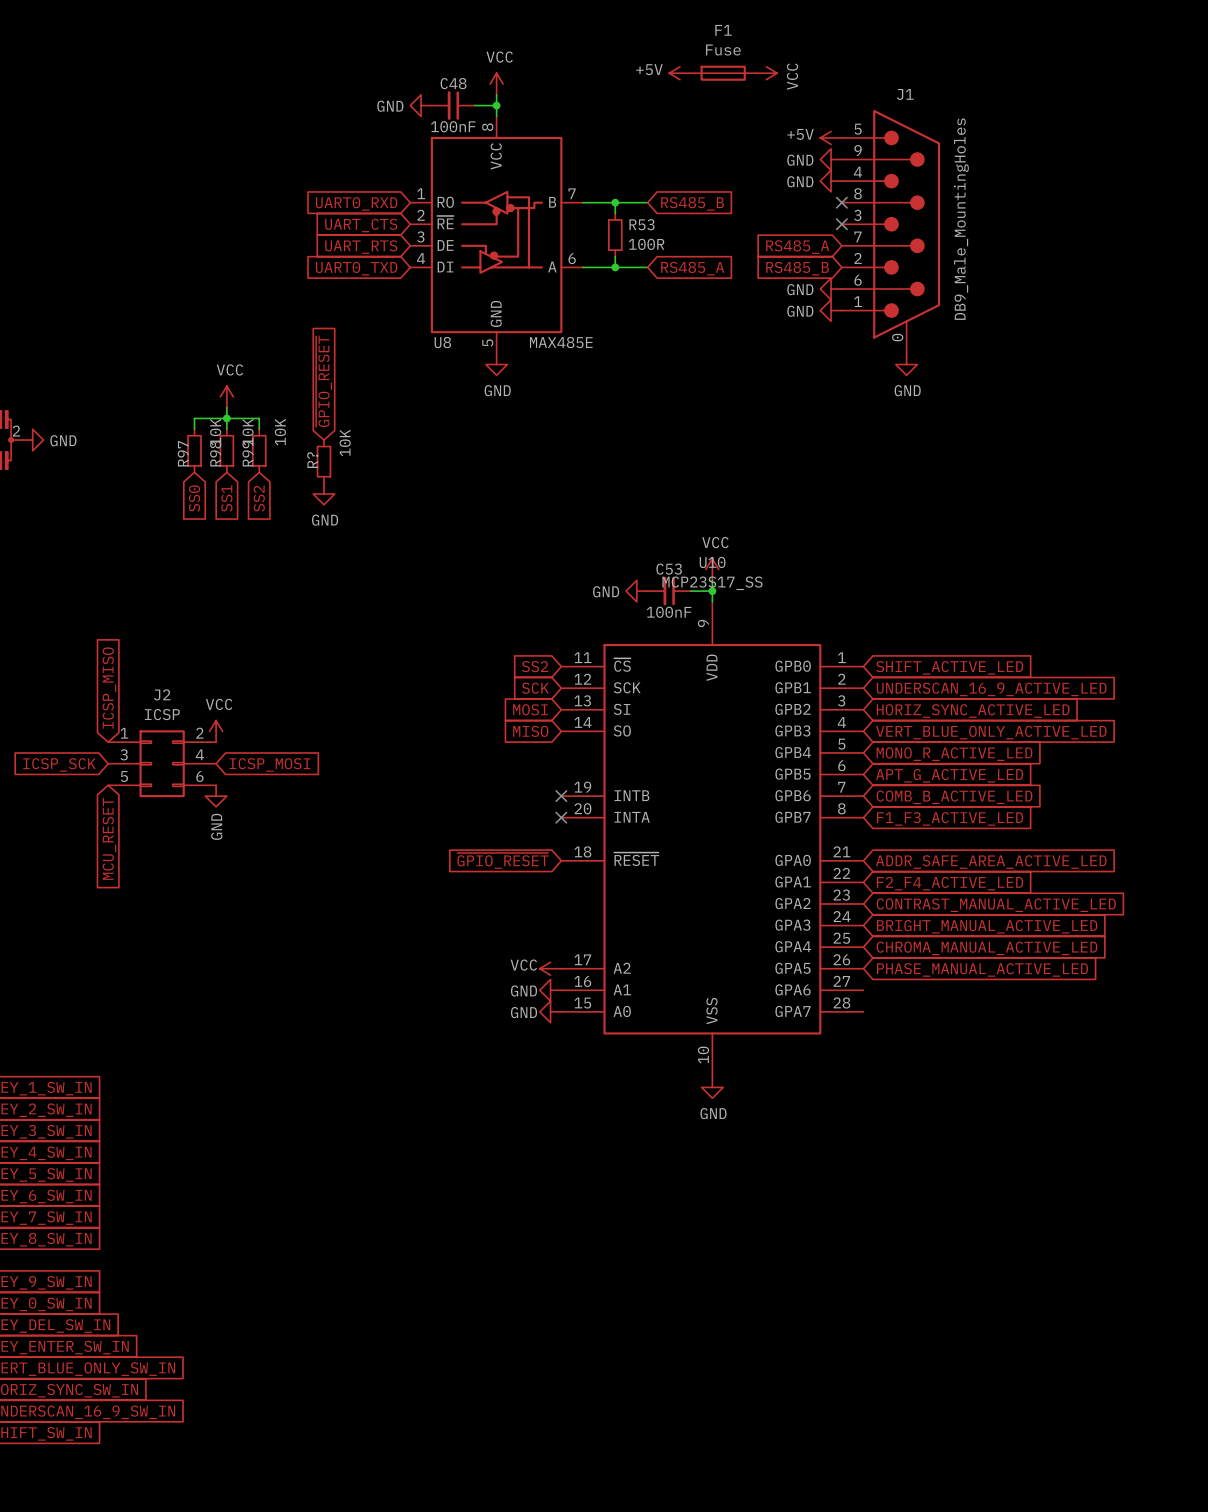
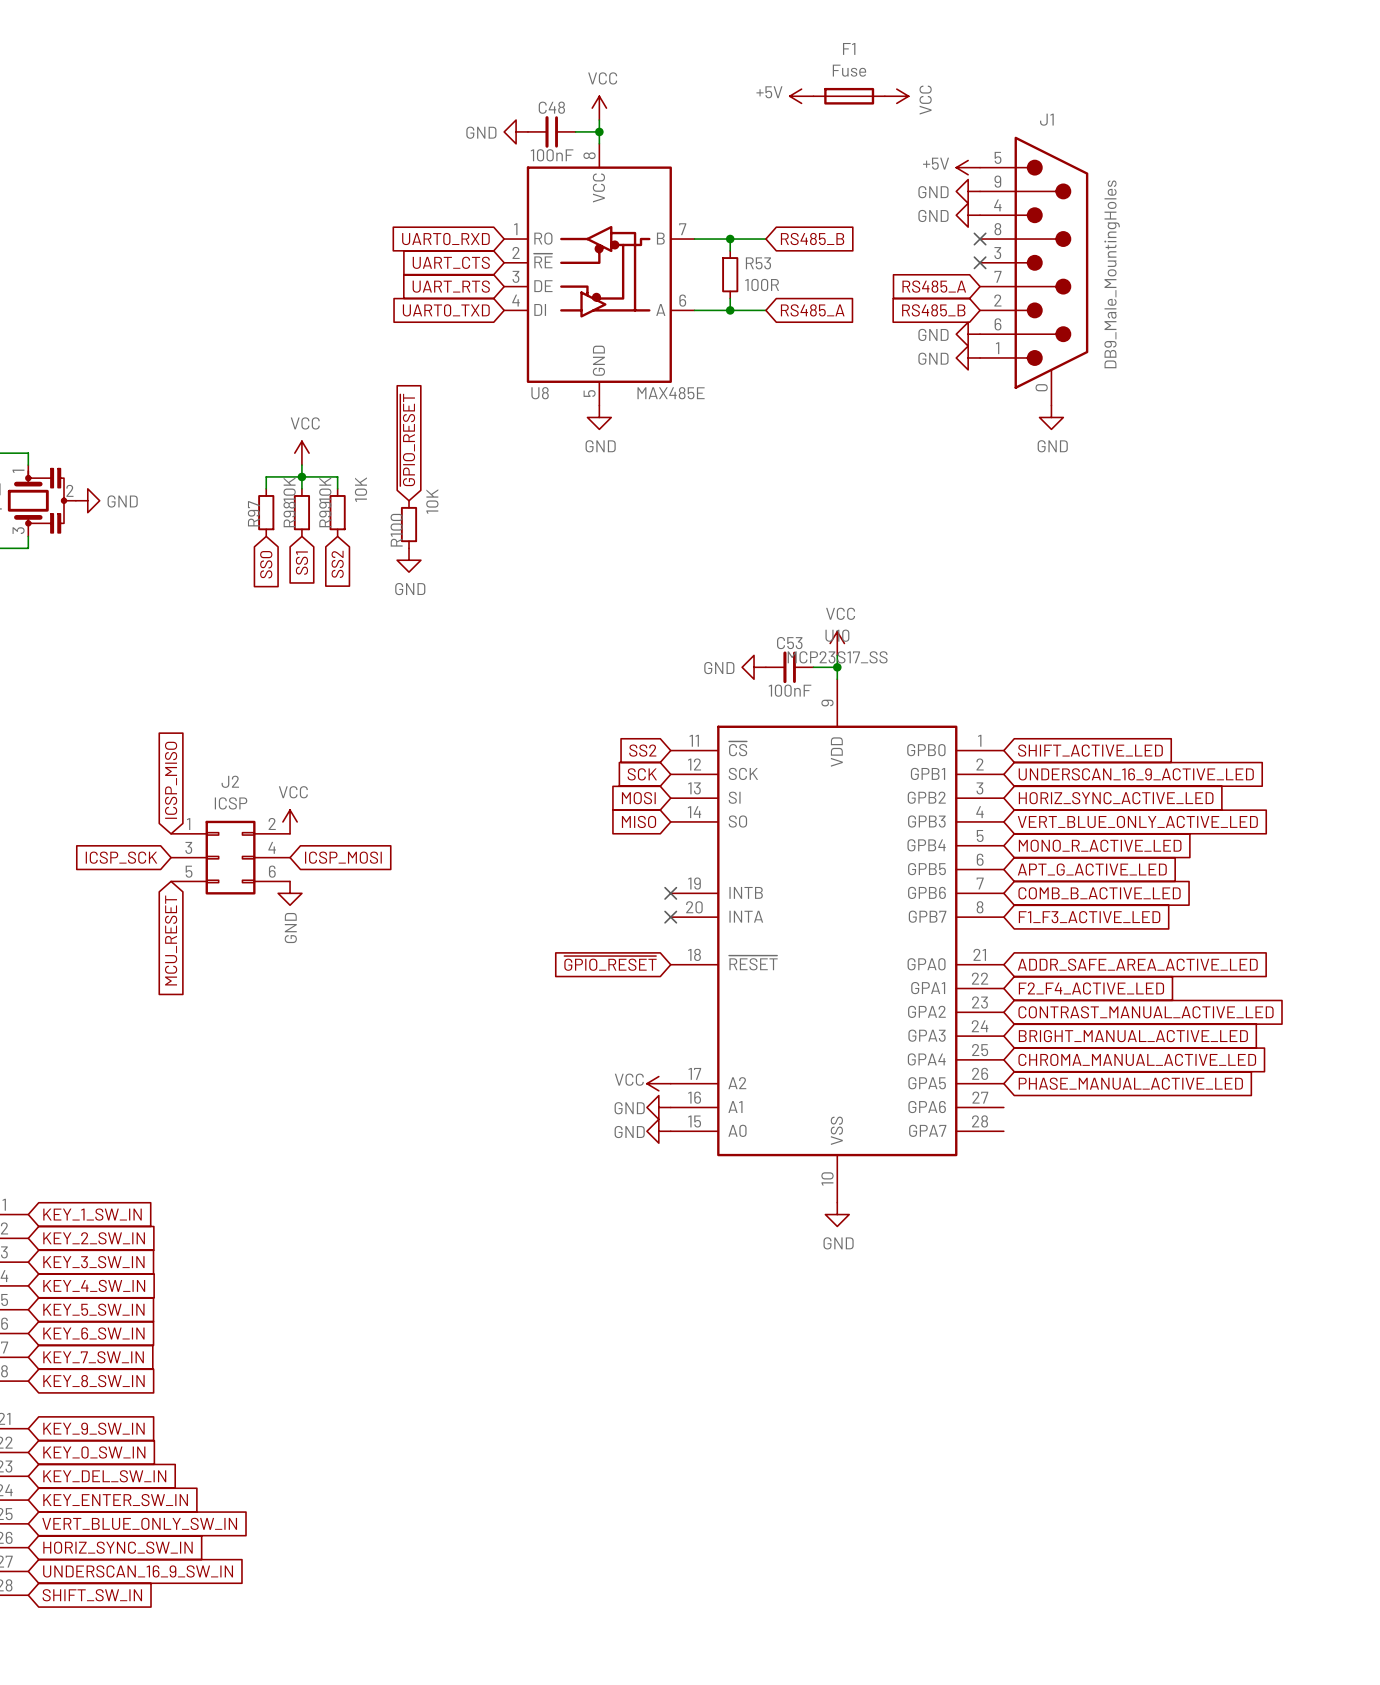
R? name: R? (312, 460) -> R100 (396, 530)

